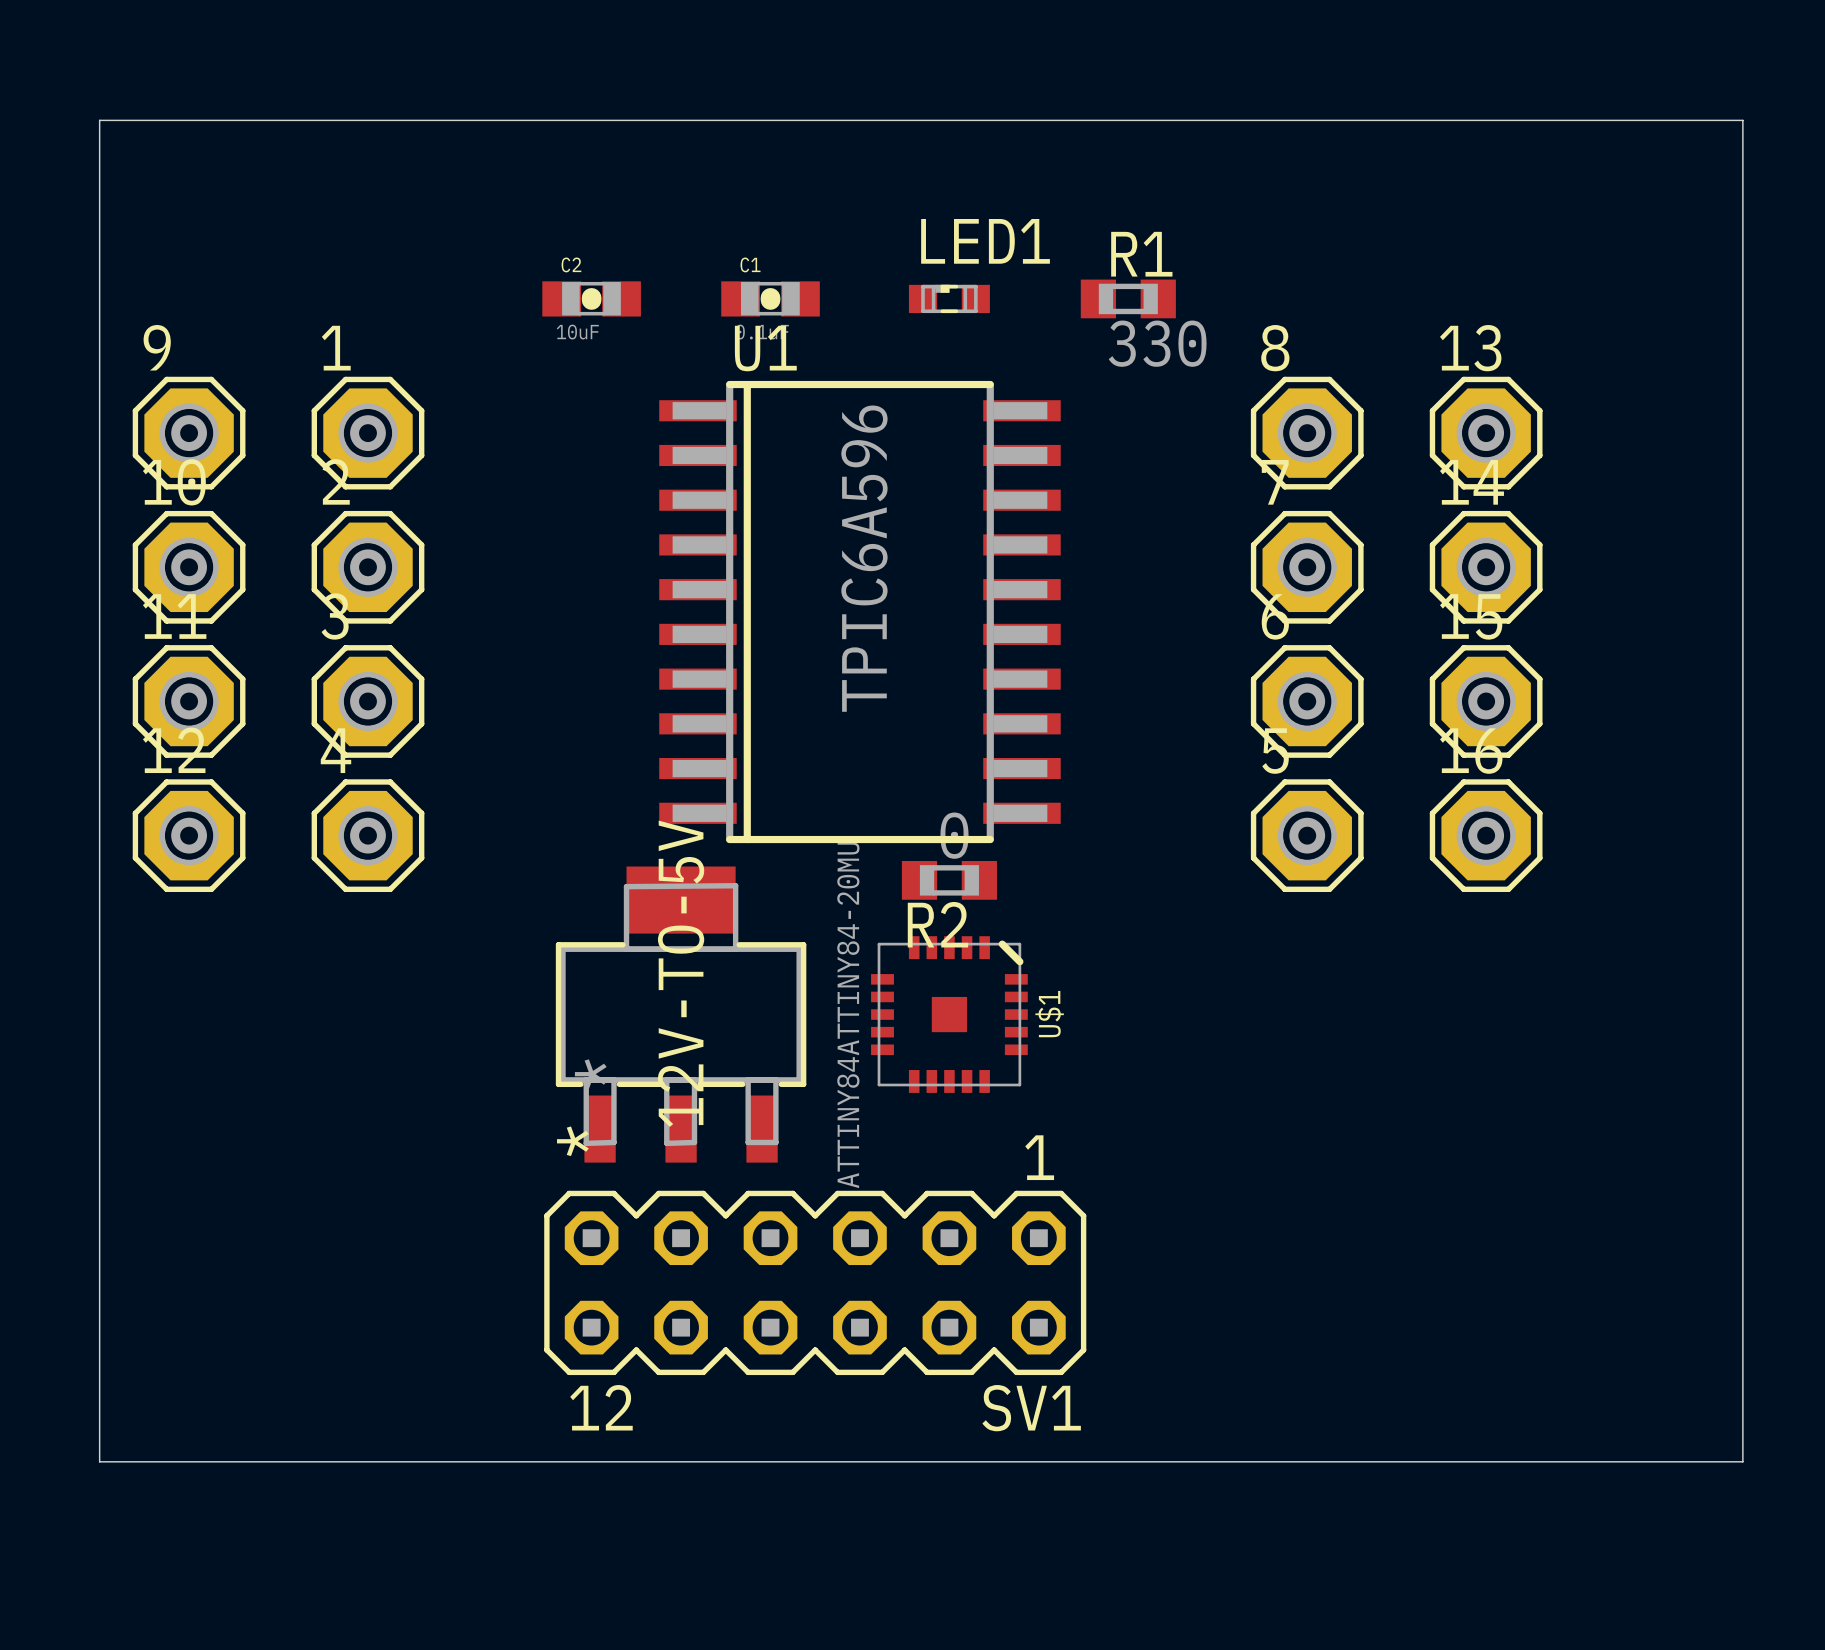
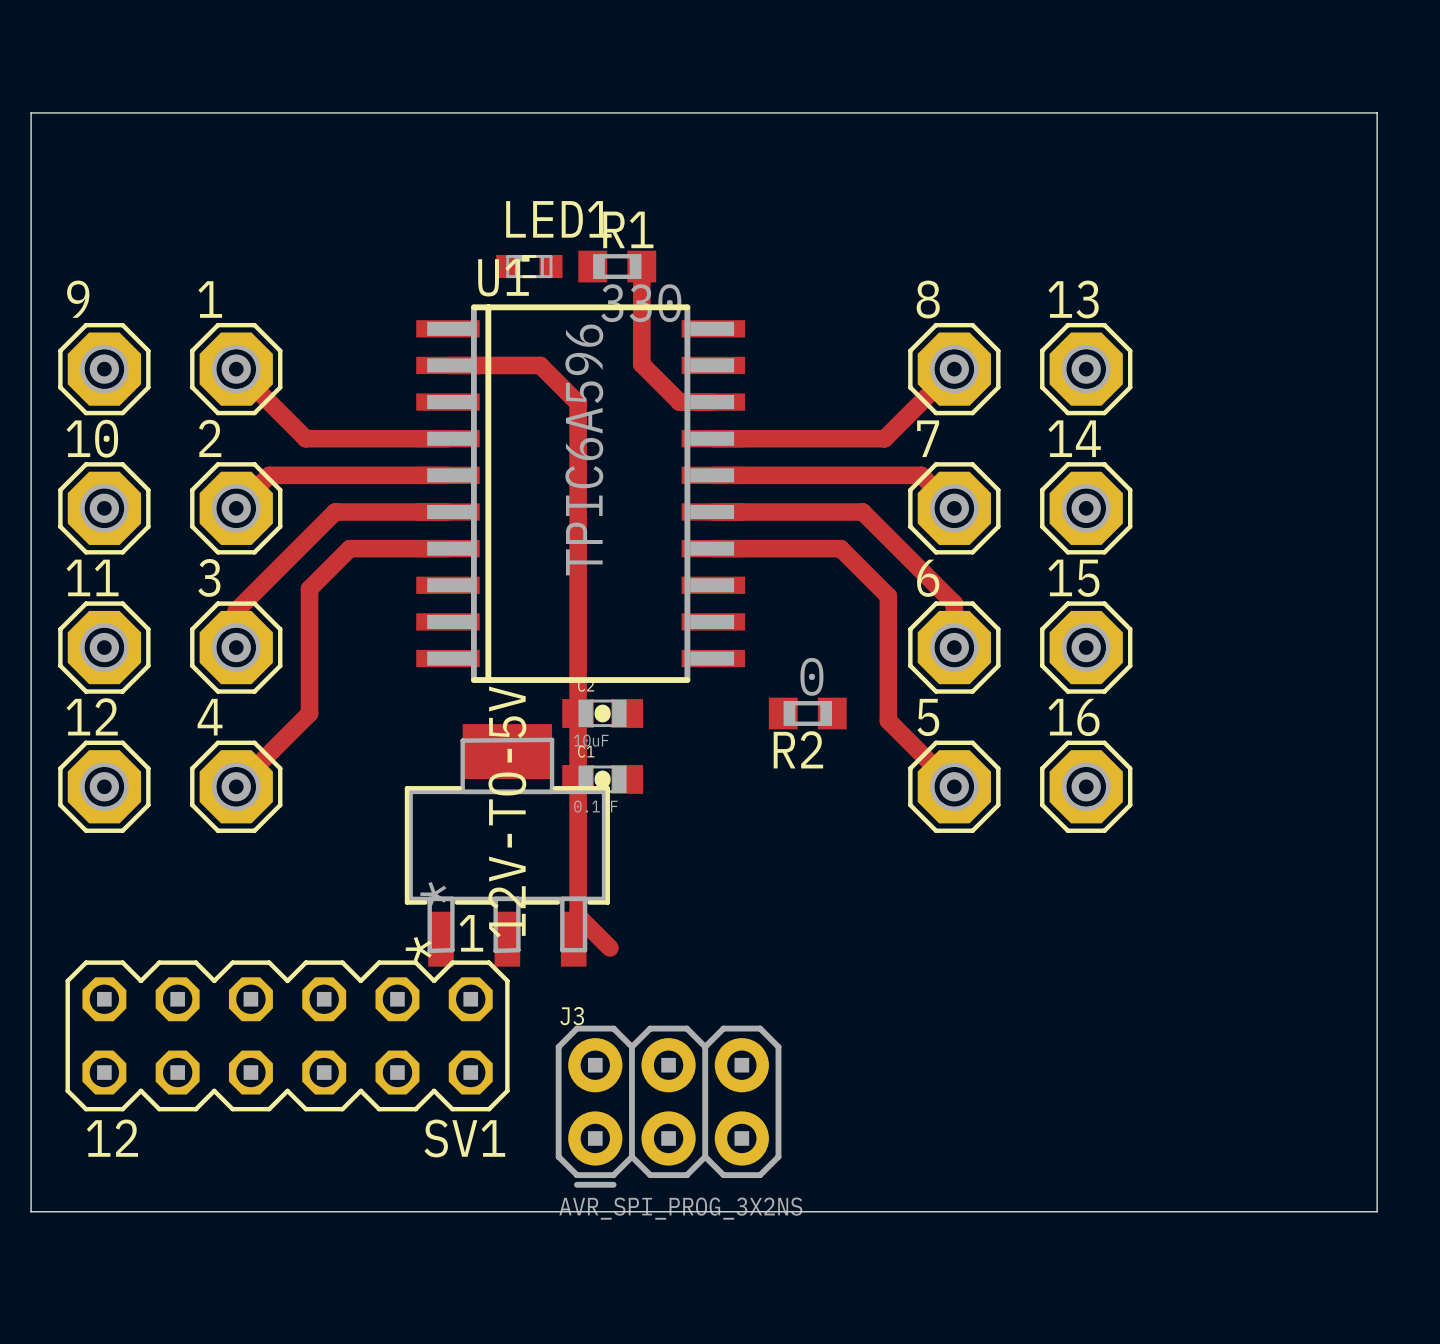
C2 position: (591, 298) -> (602, 713)
C1 position: (770, 298) -> (602, 779)
LED1 position: (949, 298) -> (529, 266)
R1 position: (1128, 298) -> (617, 266)
track: none -> (641, 266) (641, 364) (679, 402) (713, 402)
track: none -> (447, 365) (540, 365) (578, 403) (578, 916) (609, 947)
track: none -> (236, 369) (305, 438) (447, 438)
1 position: (367, 433) -> (236, 369)
track: none -> (954, 369) (884, 438) (713, 438)
8 position: (1307, 433) -> (954, 369)
13 position: (1486, 433) -> (1086, 369)
track: none -> (447, 475) (269, 475) (236, 508)
track: none -> (713, 475) (921, 475) (954, 508)
10 position: (189, 567) -> (104, 508)
2 position: (367, 567) -> (236, 508)
7 position: (1307, 567) -> (954, 508)
14 position: (1486, 567) -> (1086, 508)
track: none -> (447, 512) (335, 512) (236, 610) (236, 647)
track: none -> (713, 512) (862, 512) (954, 603) (954, 647)
U1 position: (859, 612) -> (580, 493)
track: none -> (447, 548) (349, 548) (309, 588) (309, 713) (236, 786)
track: none -> (713, 548) (840, 548) (888, 596) (888, 720) (954, 786)
11 position: (189, 701) -> (104, 647)
3 position: (367, 701) -> (236, 647)
6 position: (1307, 701) -> (954, 647)
15 position: (1486, 701) -> (1086, 647)
12 position: (189, 835) -> (104, 786)
4 position: (367, 835) -> (236, 786)
5 position: (1307, 835) -> (954, 786)
16 position: (1486, 835) -> (1086, 786)
R2 position: (949, 880) -> (807, 713)
U$1: ATTINY84ATTINY84-20MU (949, 1014) -> none
SV1 position: (815, 1282) -> (287, 1035)
J3: none -> AVR_SPI_PROG_3X2NS (668, 1106)

